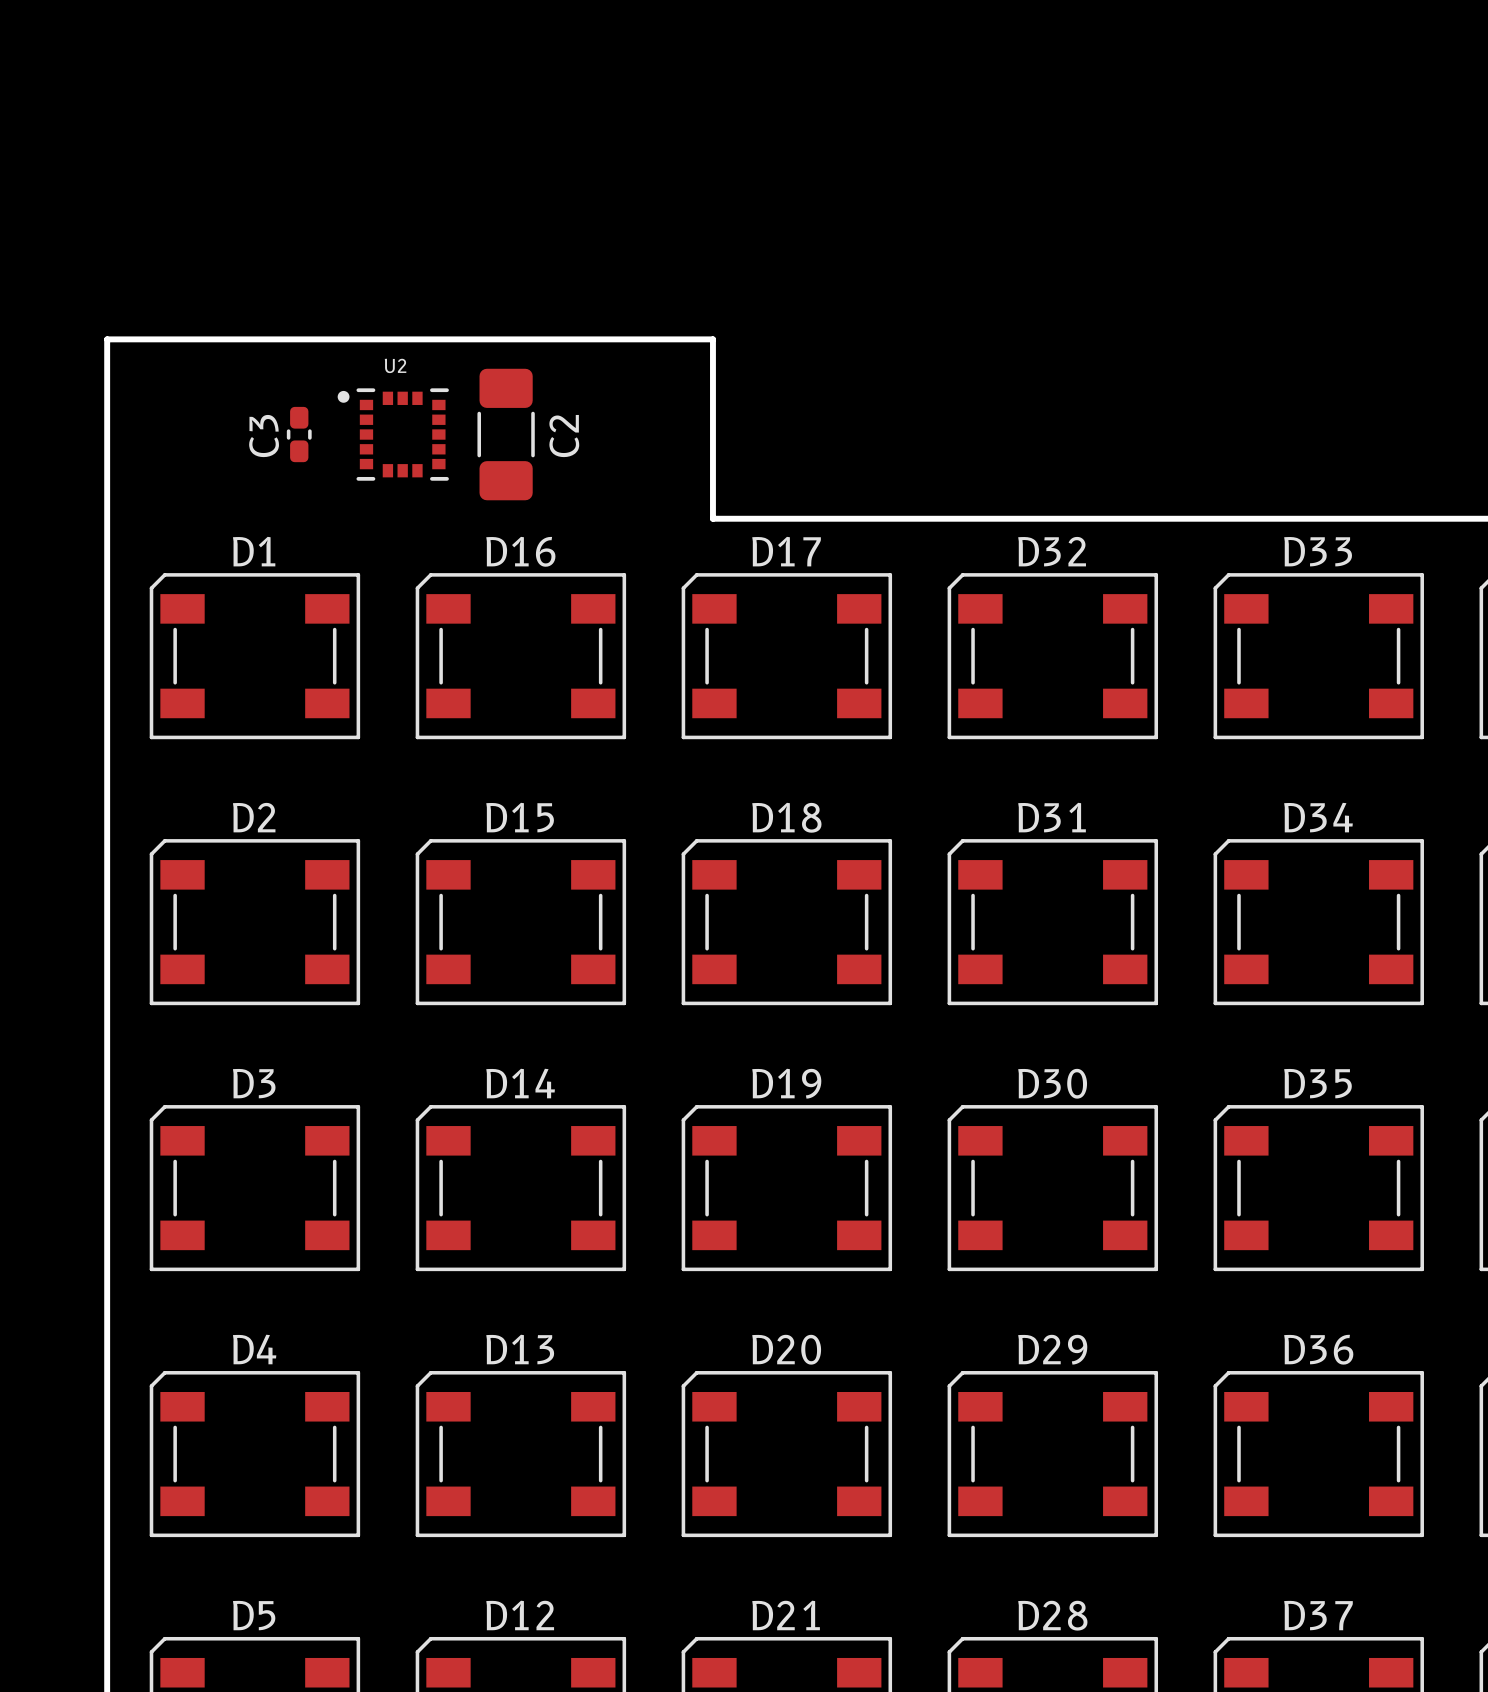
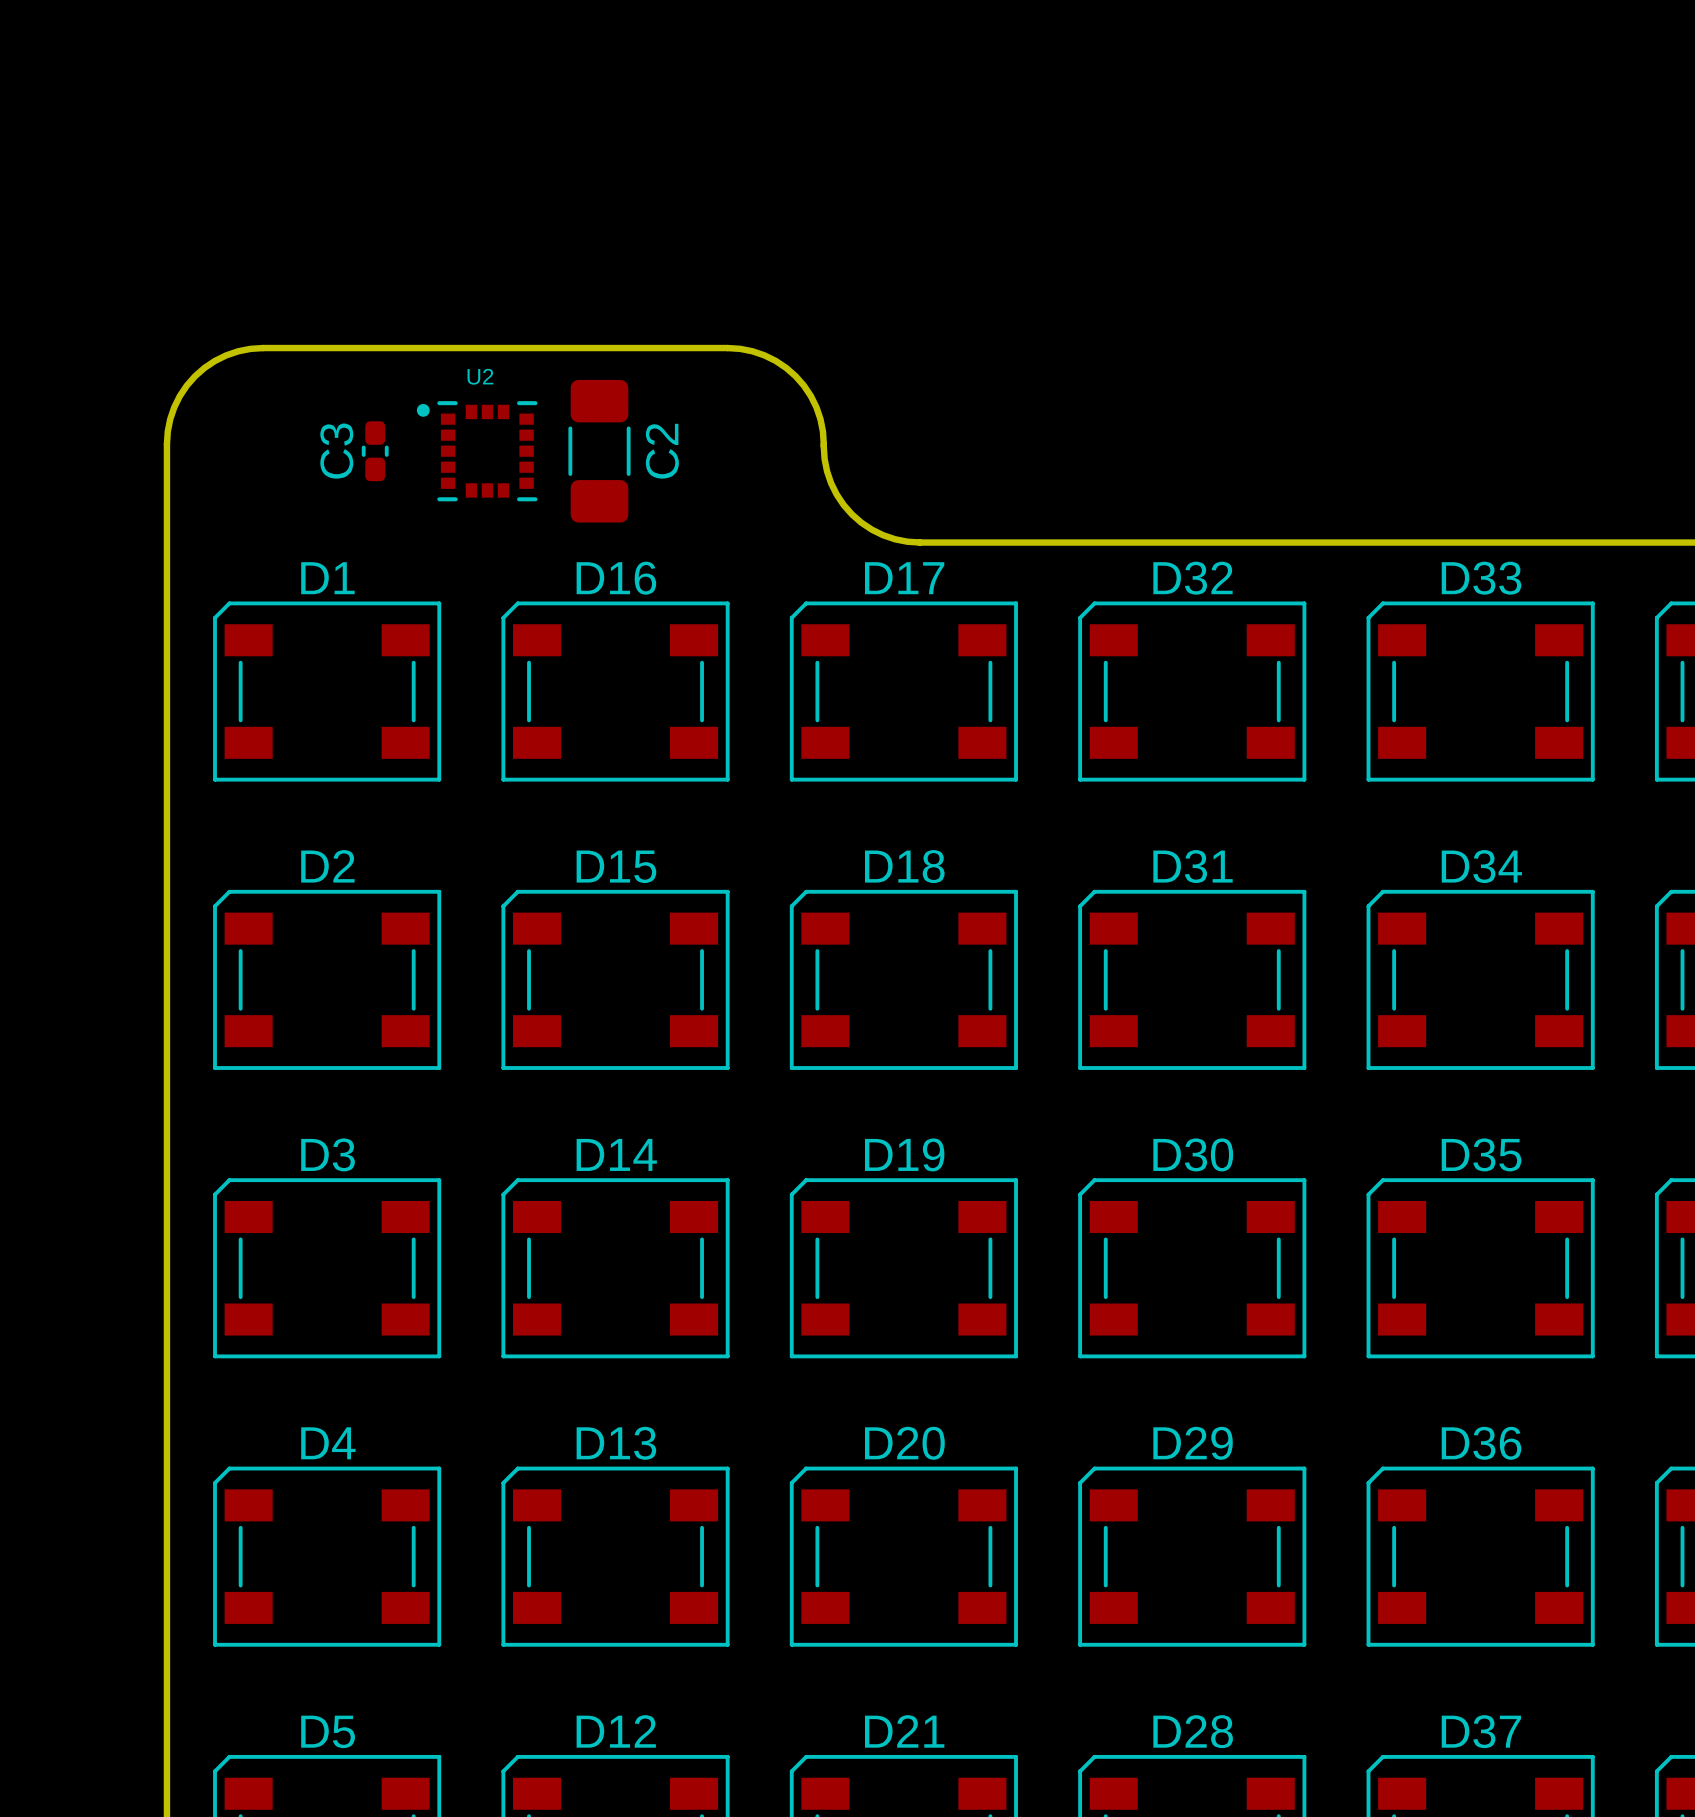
board edge: (195, 339) (107, 339) (107, 428) -> (263, 348) (238, 351) (226, 355) (204, 367) (195, 376) (186, 385) (174, 407) (170, 419) (166, 444)
board edge: (624, 339) (712, 339) (712, 428) -> (727, 348) (752, 351) (764, 355) (786, 367) (795, 376) (803, 385) (816, 407) (820, 419) (823, 444)
board edge: (712, 430) (712, 518) (801, 518) -> (823, 446) (824, 458) (831, 483) (843, 504) (851, 514) (861, 522) (883, 535) (895, 539) (919, 542)

